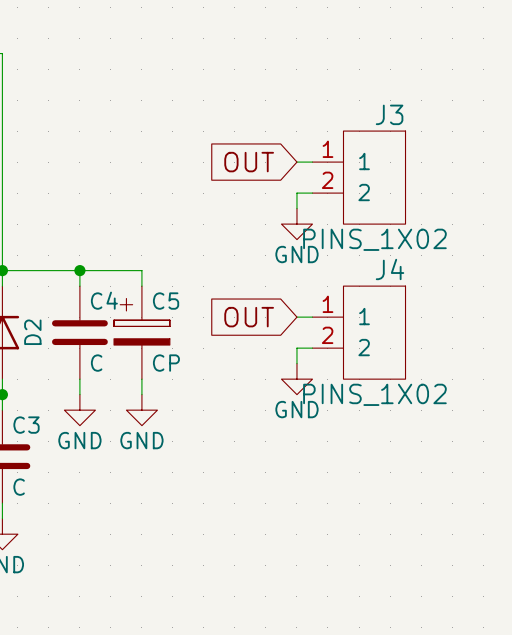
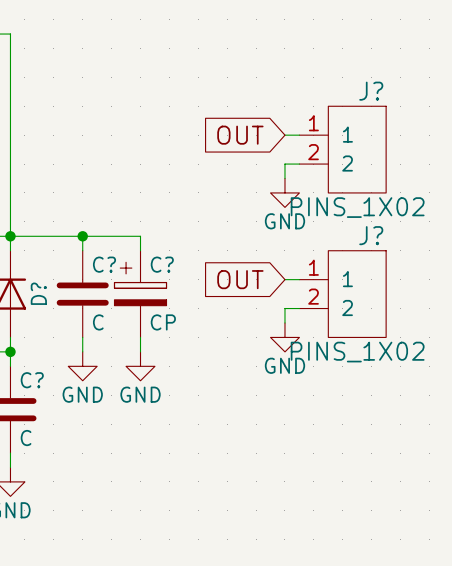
J3 name: J3 (389, 114) -> J? (371, 91)
J4 name: J4 (390, 269) -> J? (371, 235)
C4 name: C4 (104, 300) -> C? (104, 264)
C5 name: C5 (166, 301) -> C? (162, 264)
D2 name: D2 (32, 332) -> D? (38, 293)
C3 name: C3 (26, 425) -> C? (32, 380)

